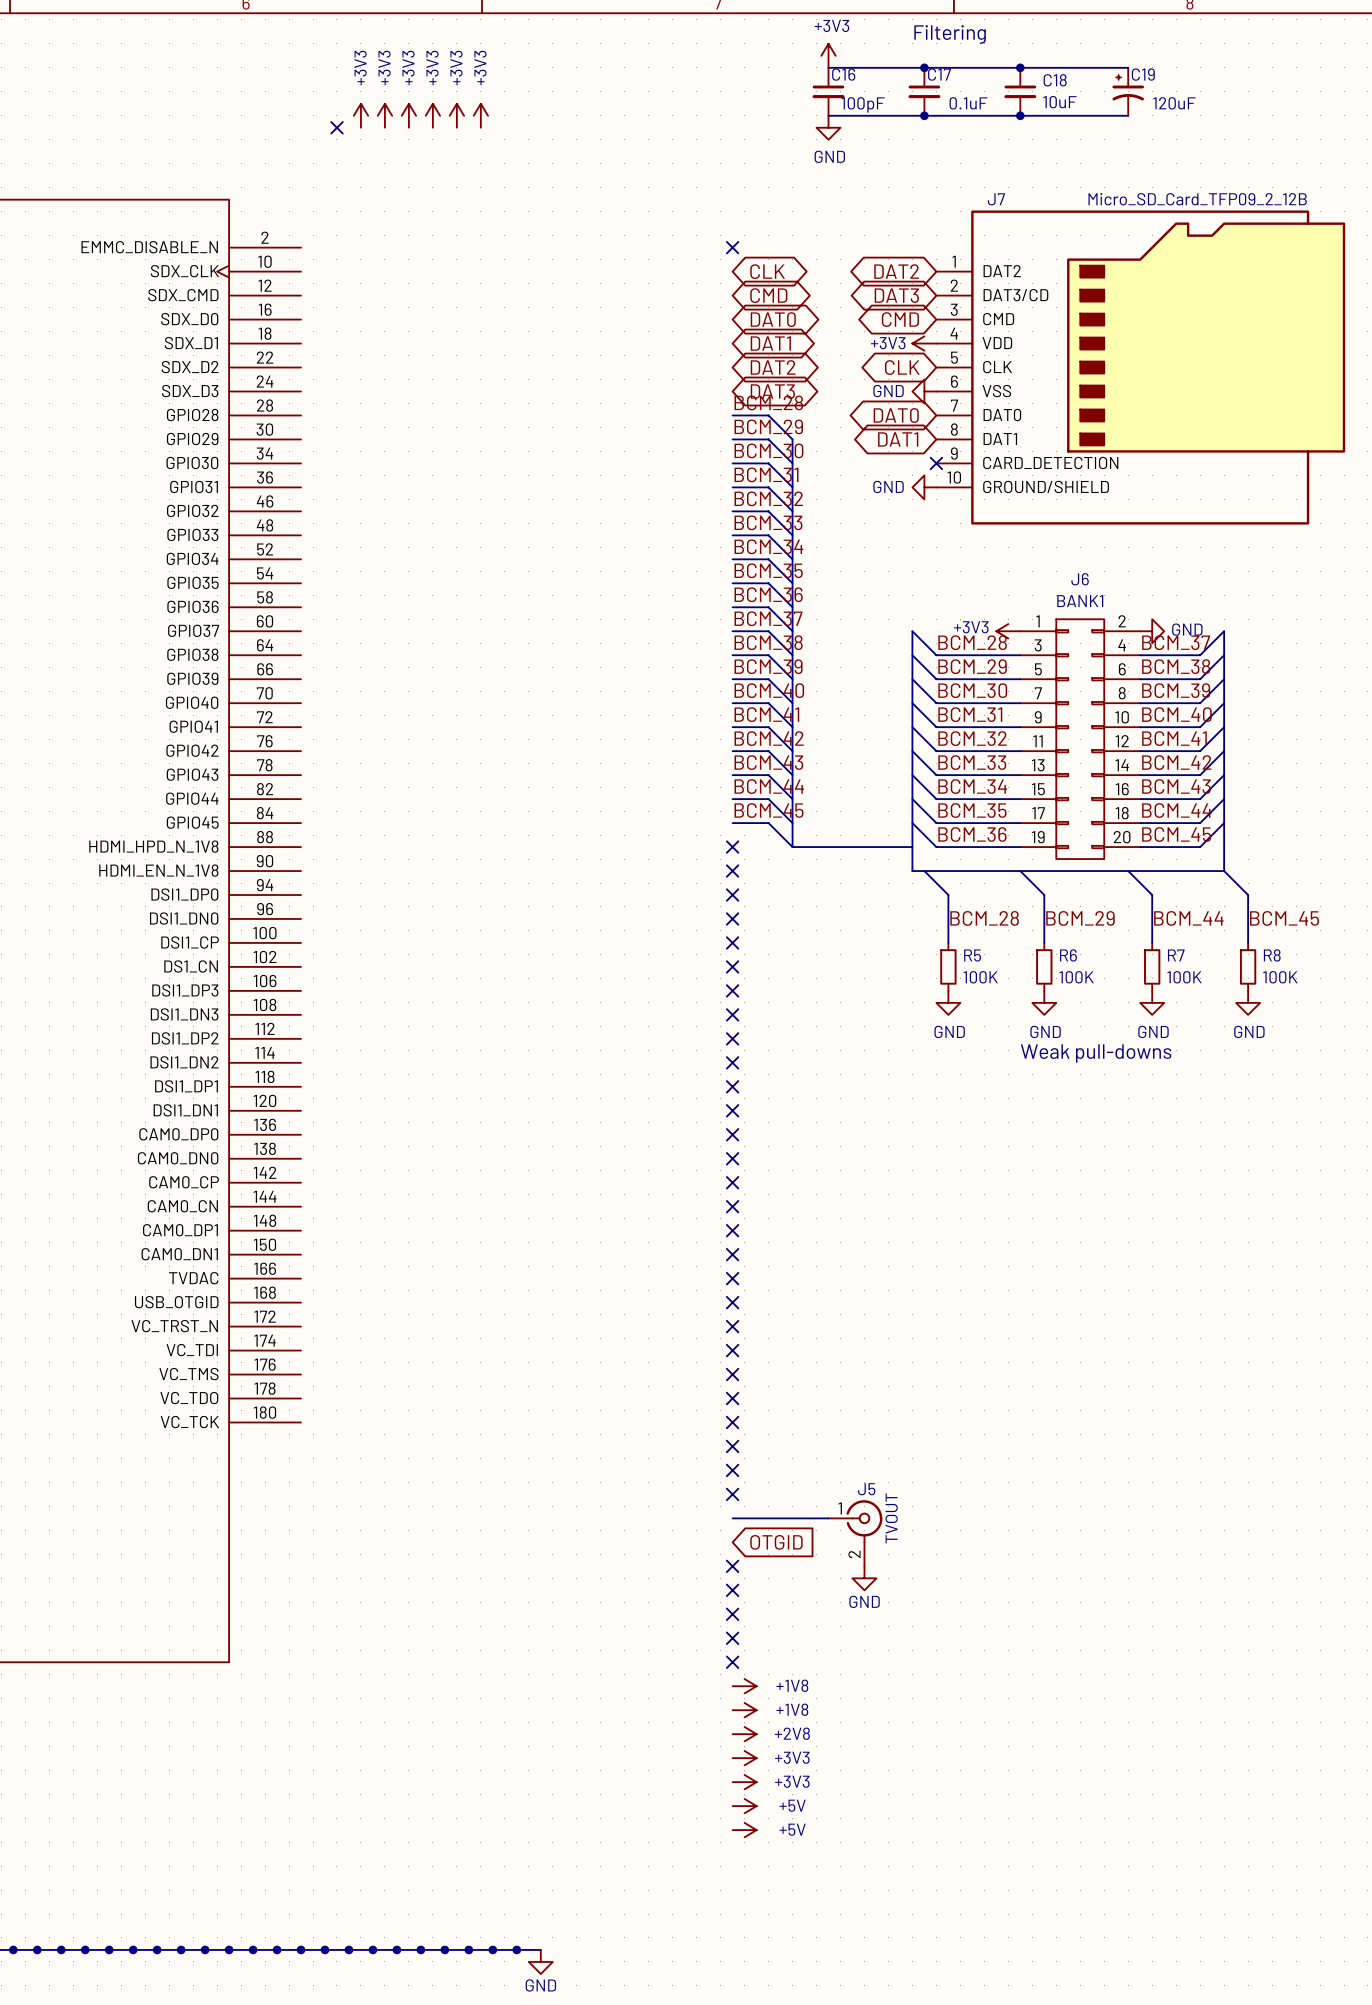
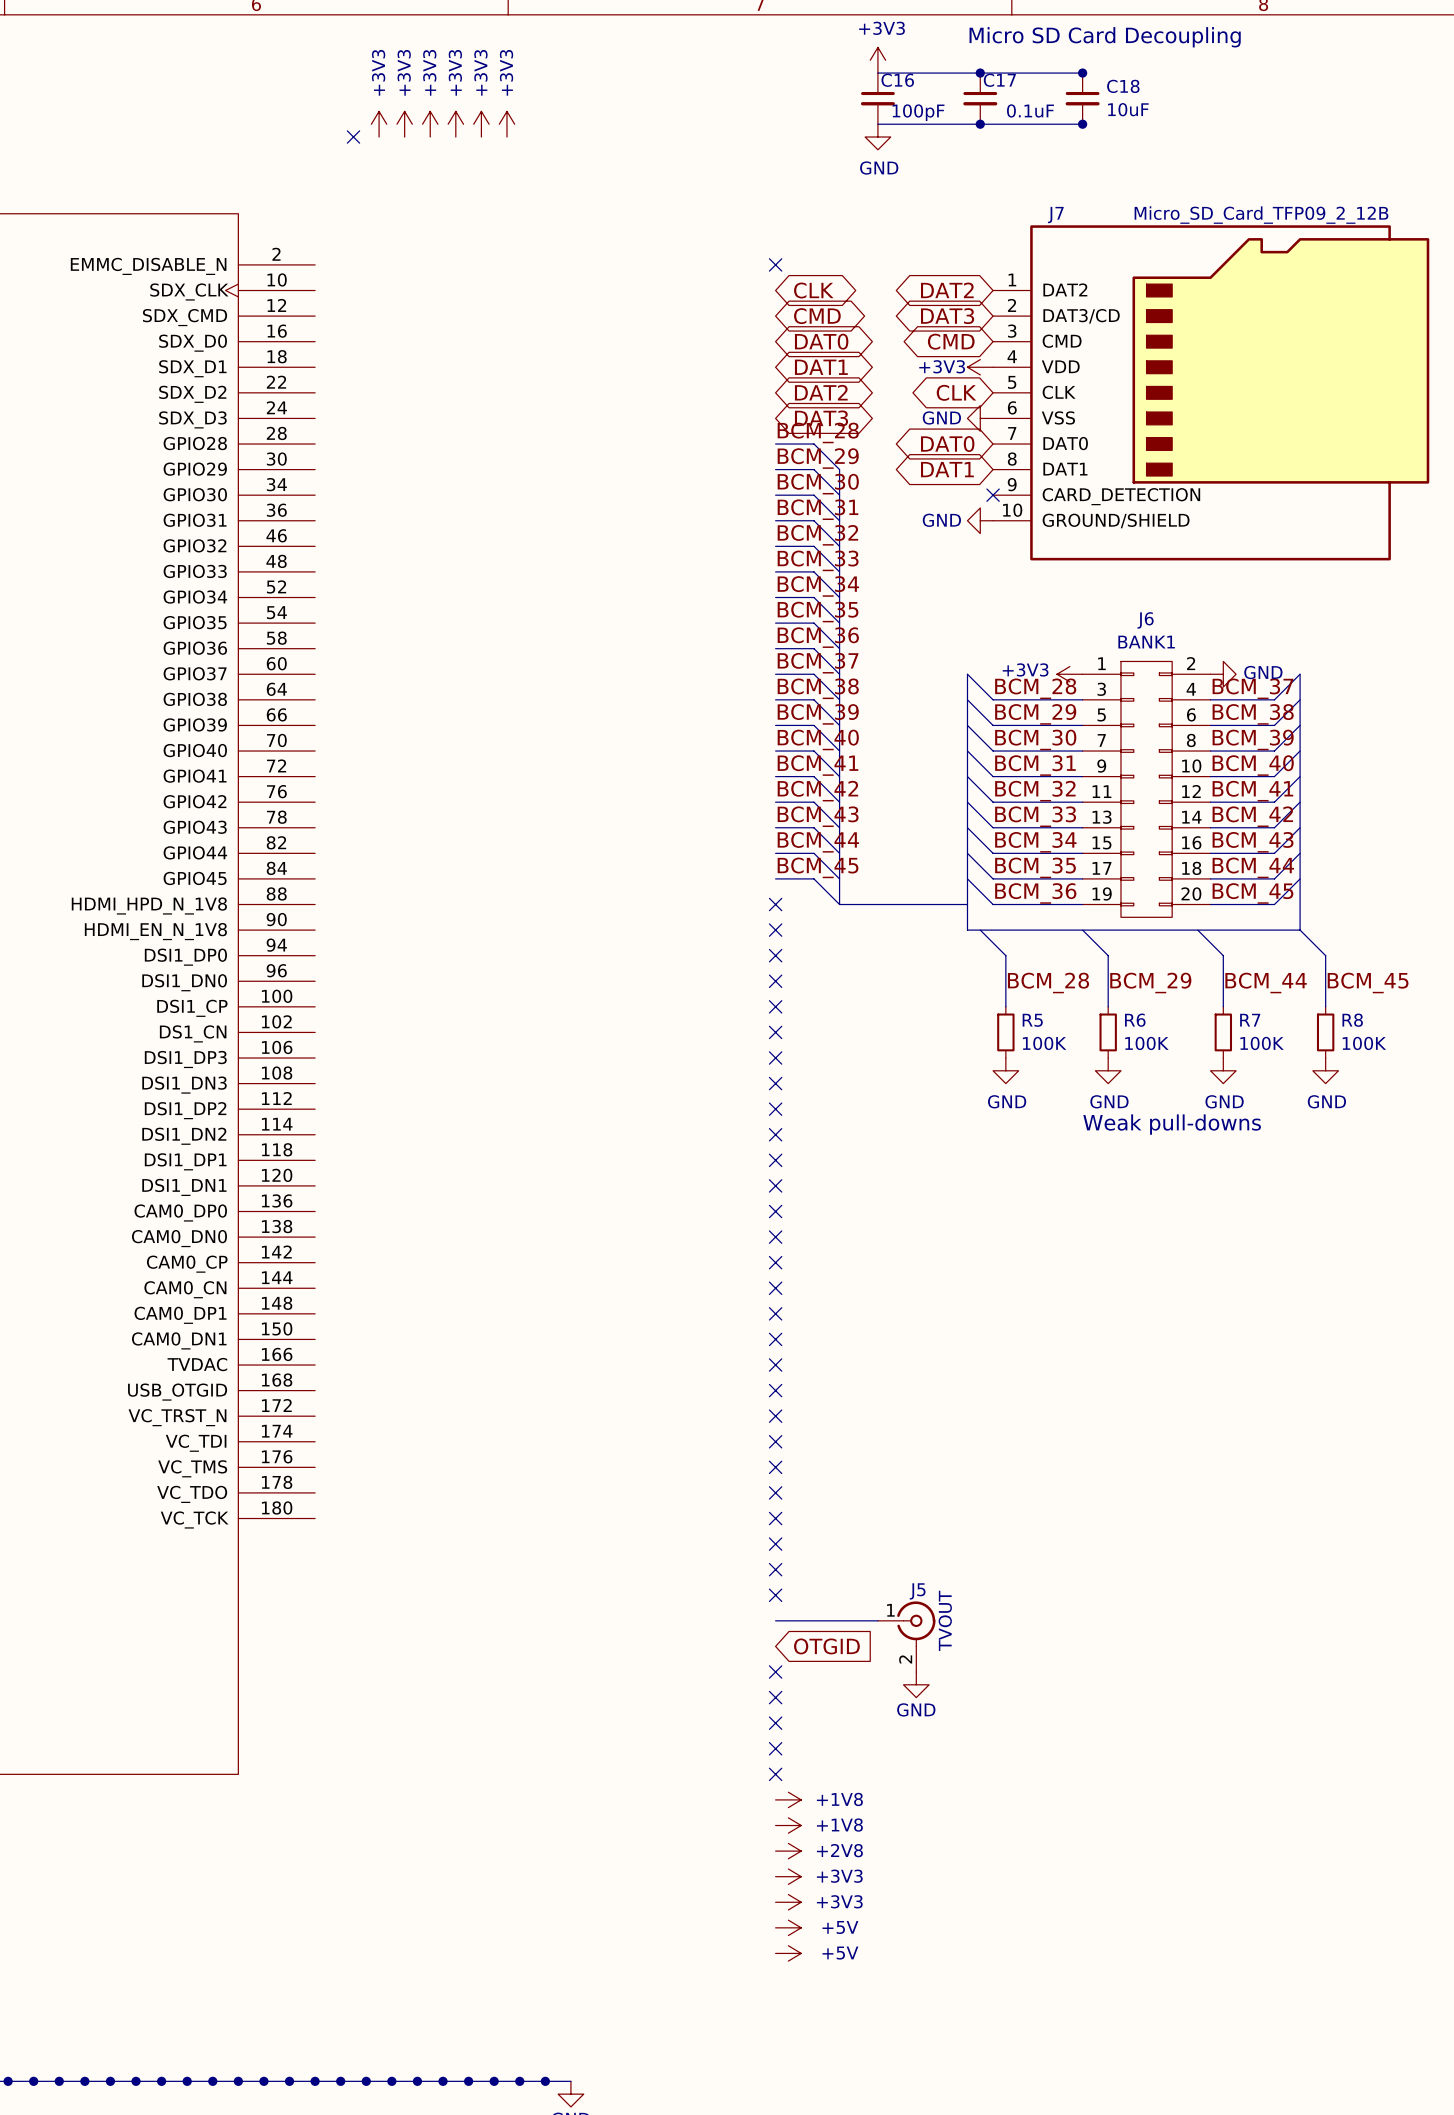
text: Filtering (950, 34) -> Micro SD Card Decoupling (1105, 37)
wire: (1020, 67) (1128, 67) -> none
C19: 120uF (1128, 91) -> none
wire: (1020, 115) (1128, 115) -> none

